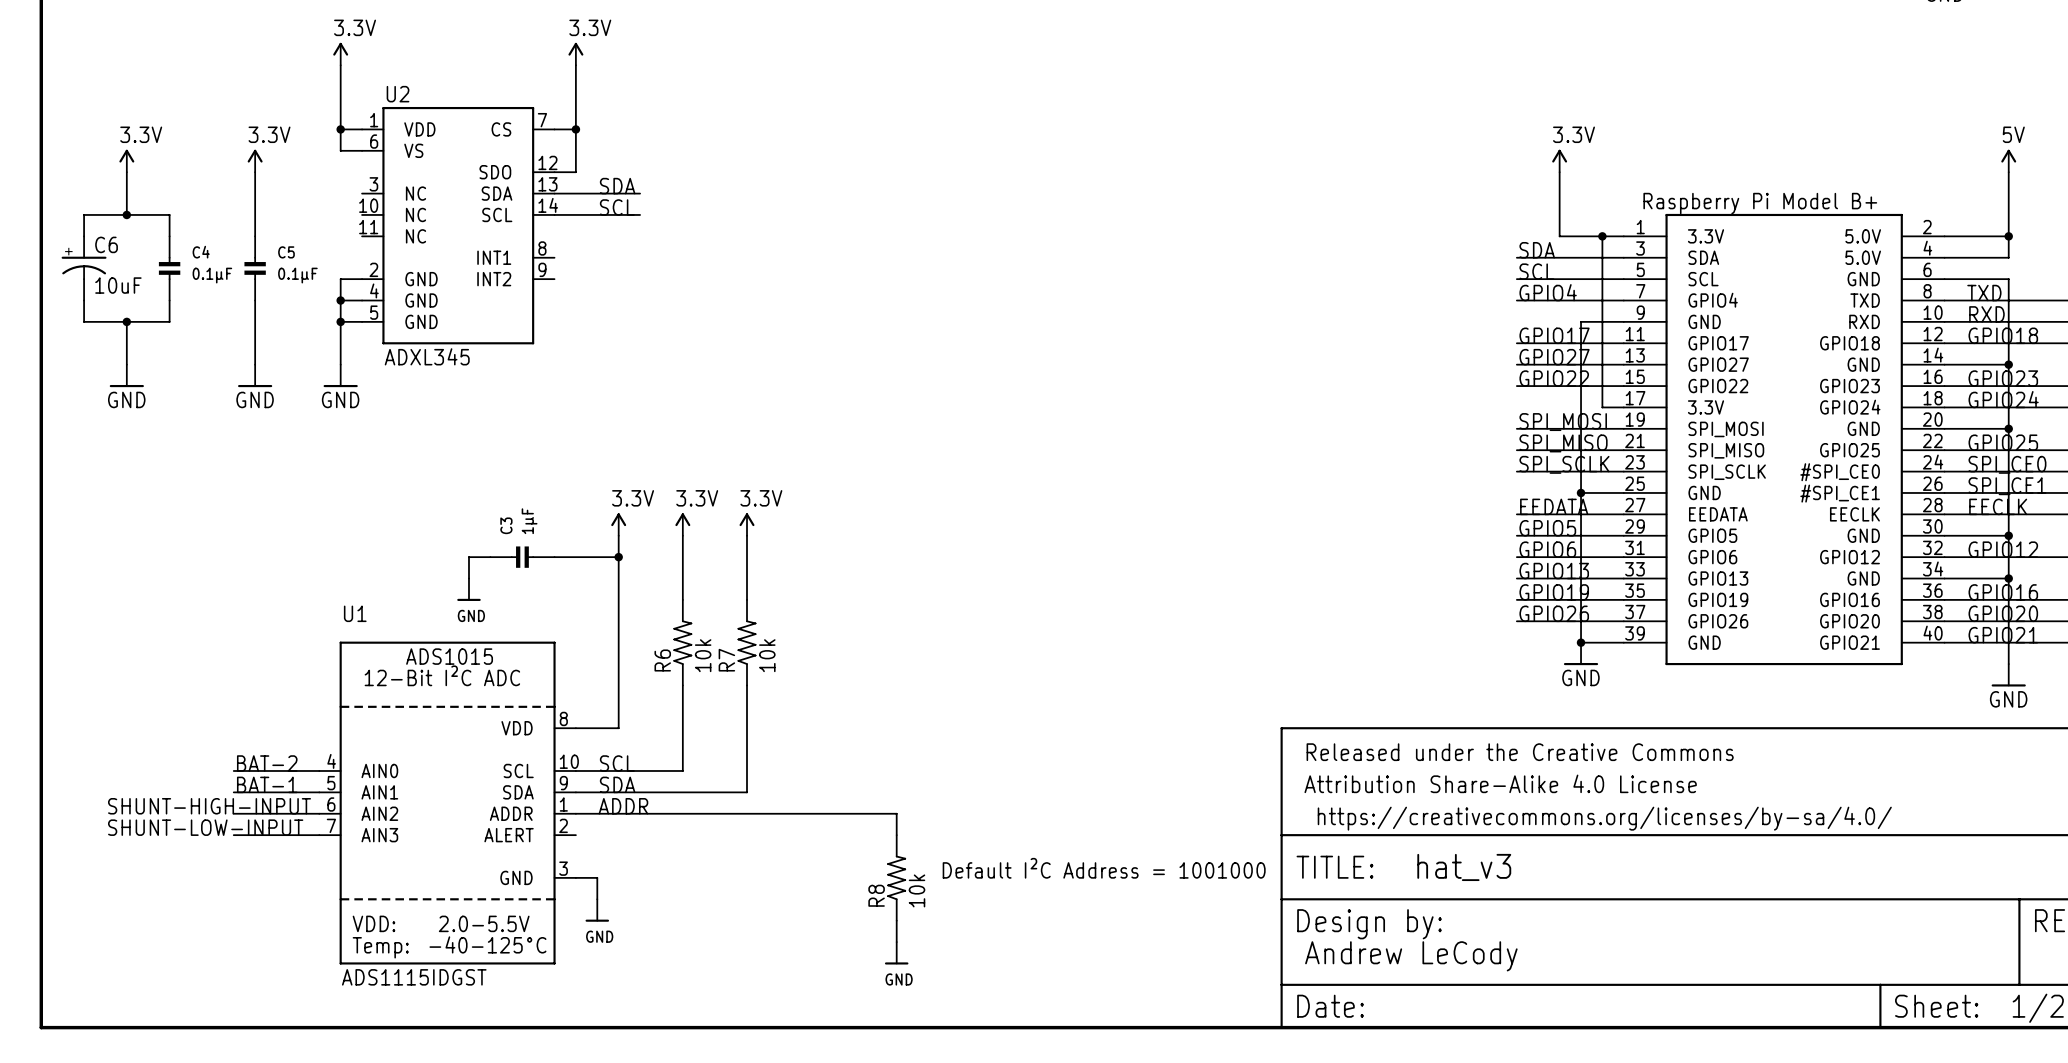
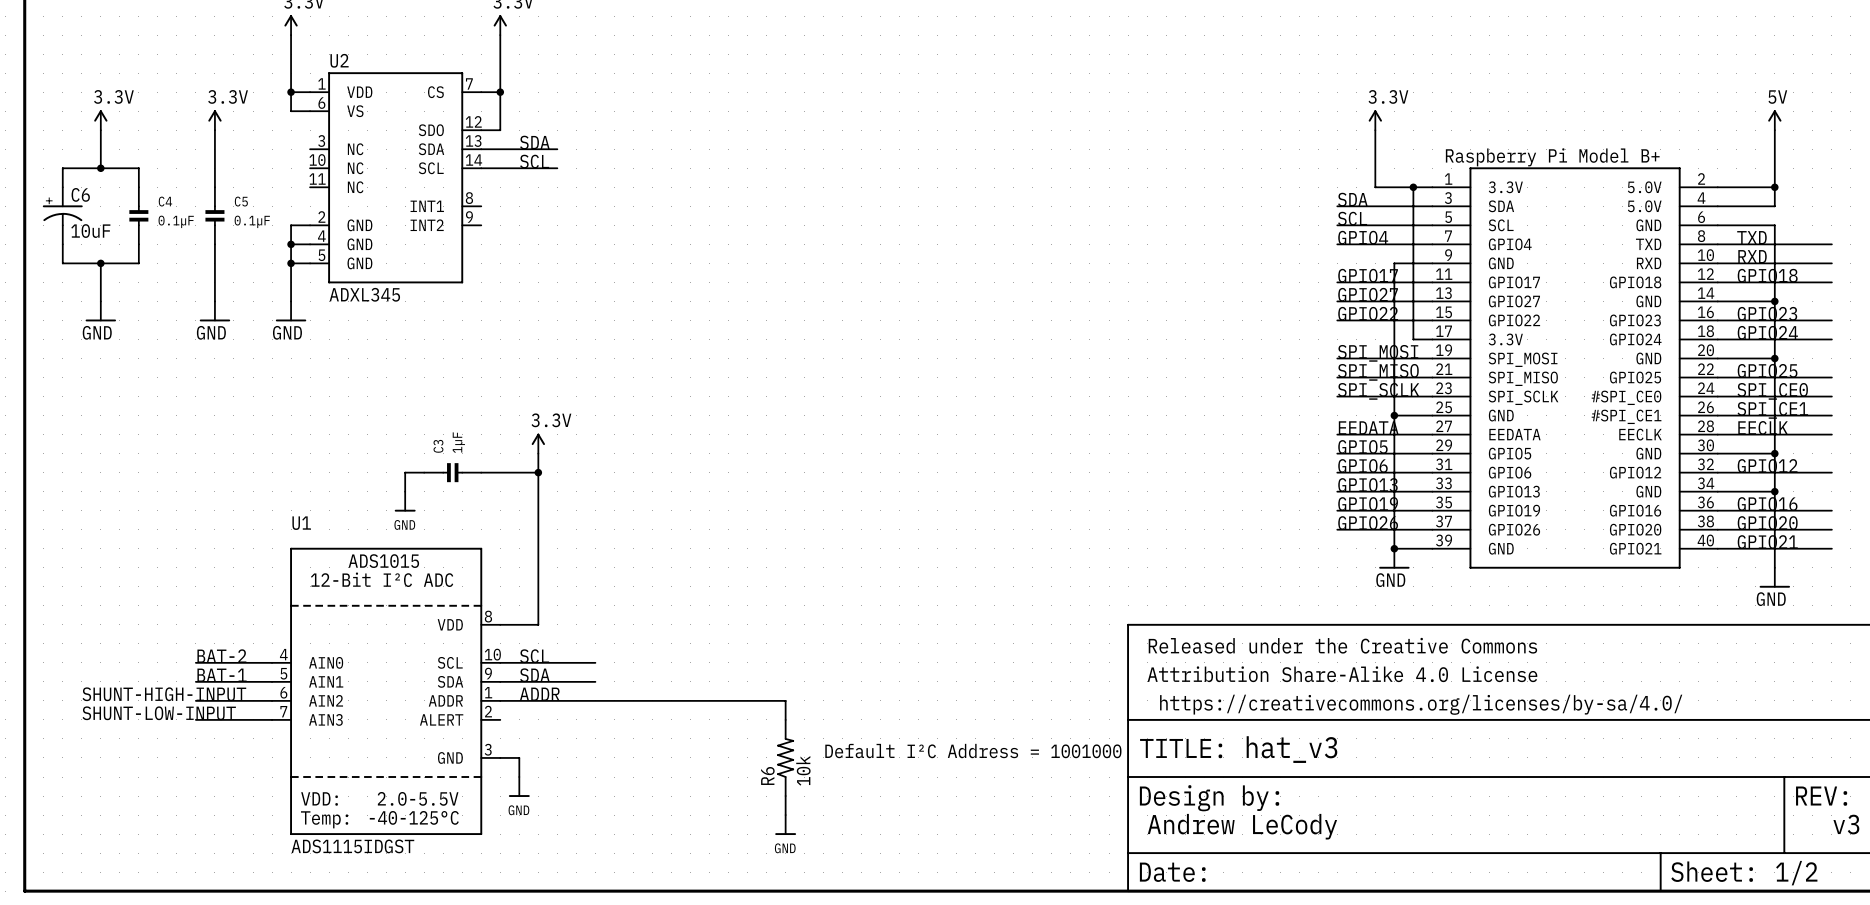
power symbol: 3.3V (682, 524) -> none
power symbol: 3.3V (747, 524) -> none
wire: (682, 535) (682, 599) -> none
wire: (747, 535) (747, 599) -> none
R6: 10k (682, 642) -> none
R7: 10k (747, 642) -> none
wire: (682, 685) (682, 770) -> none
wire: (747, 685) (747, 792) (682, 792) -> none
R8 name: R8 (876, 895) -> R6 (767, 775)

